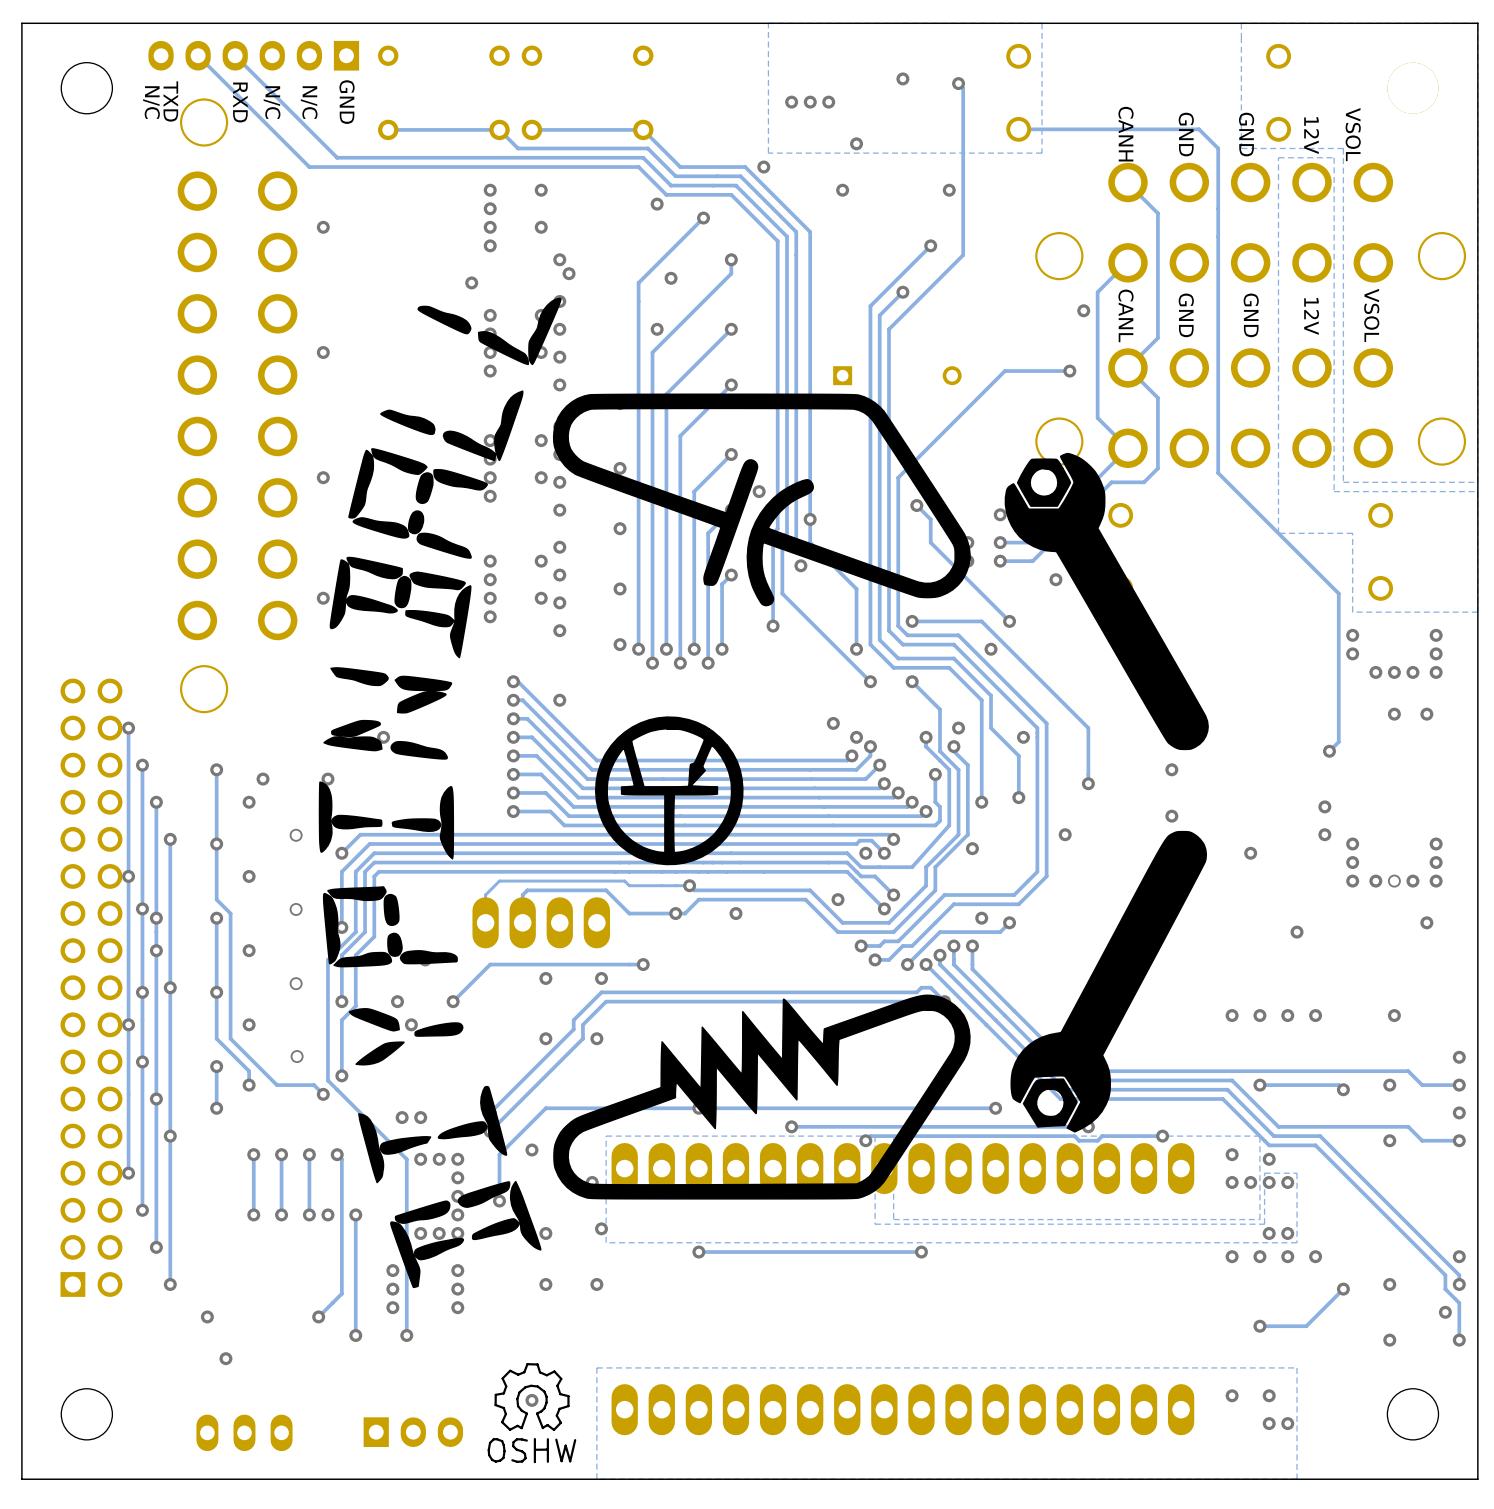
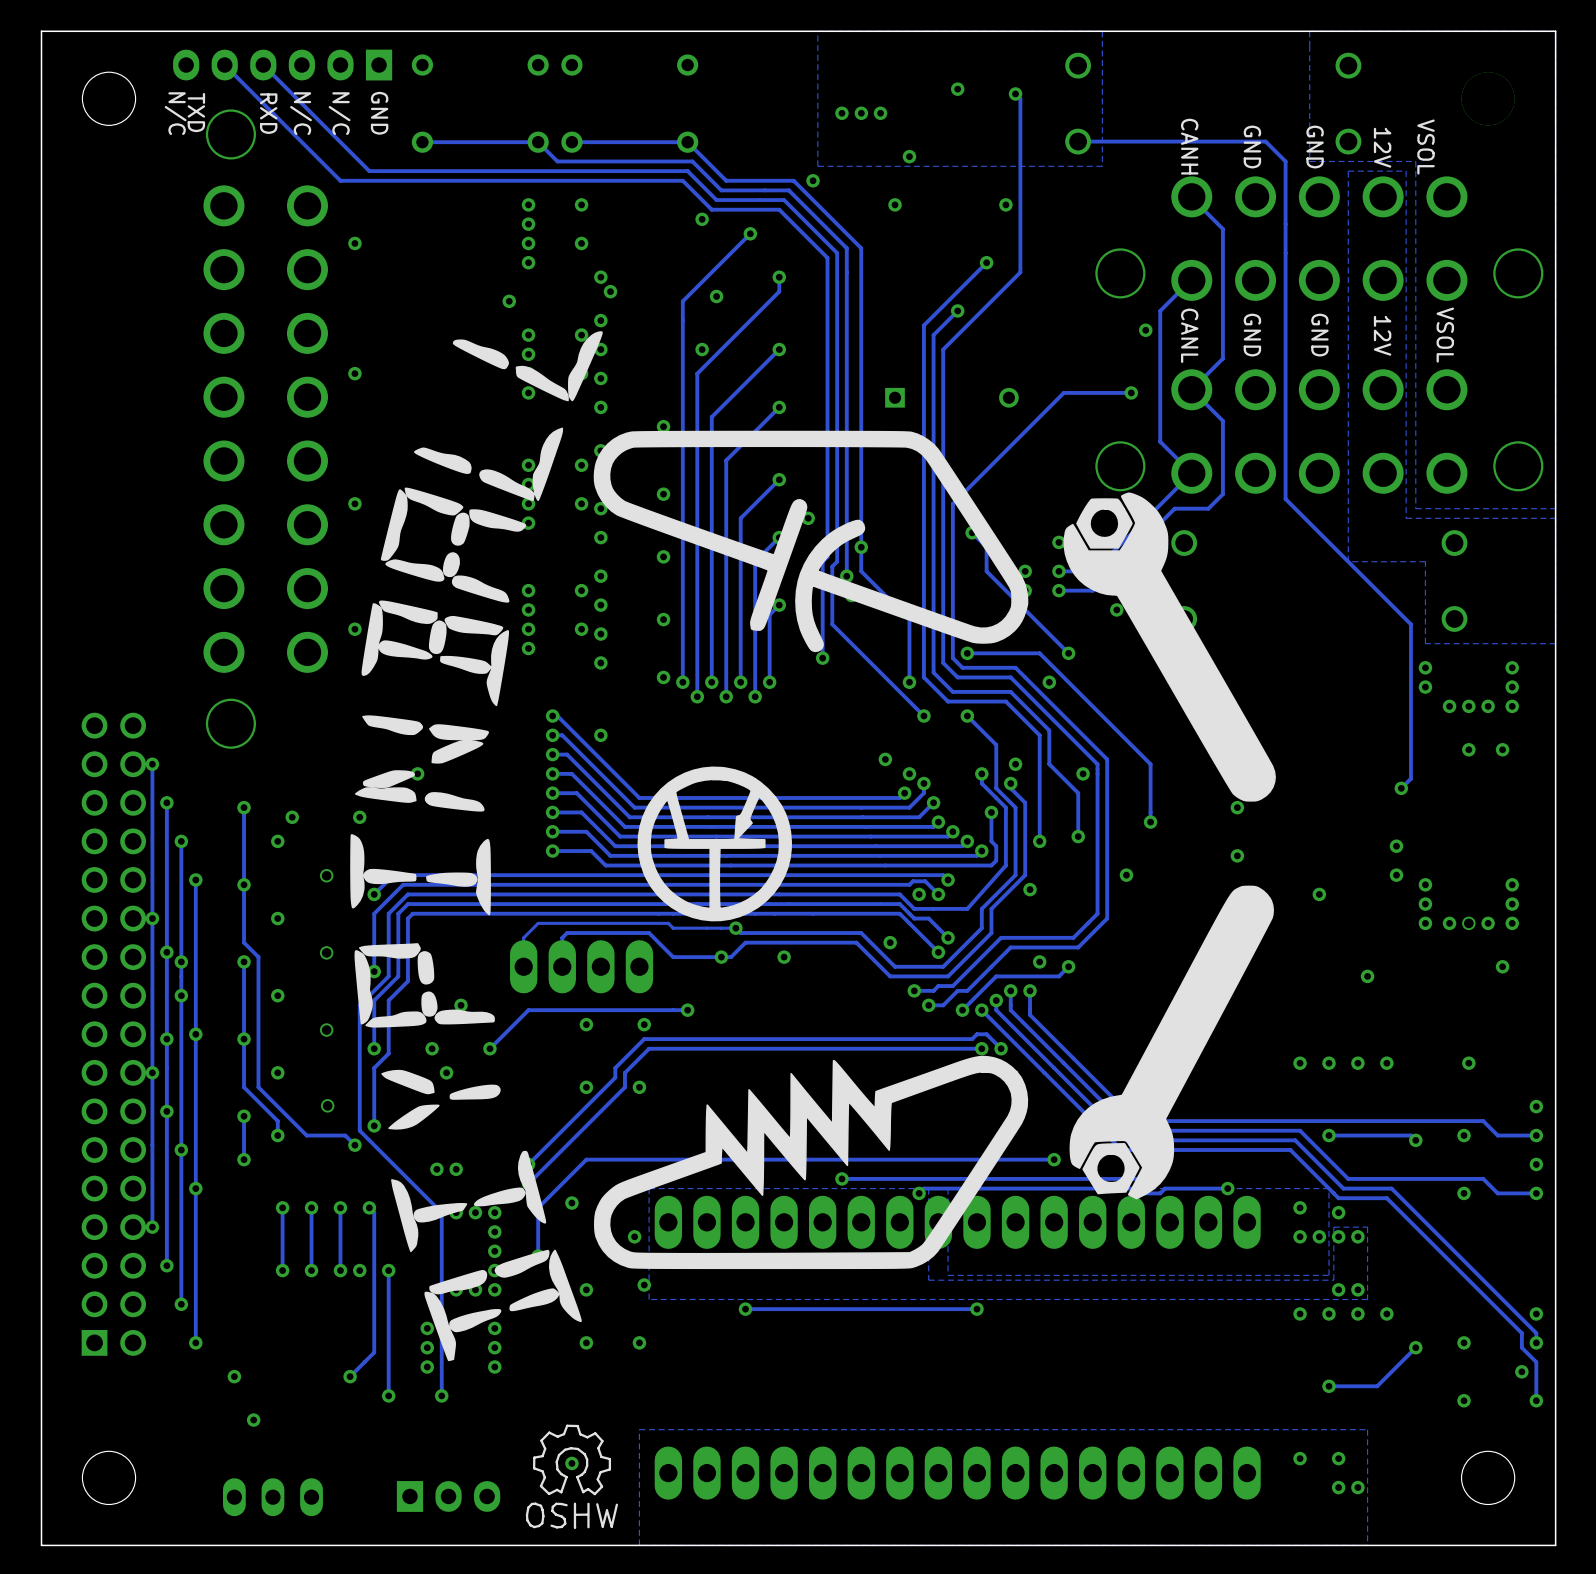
drawing position: (763, 792) -> (813, 846)

